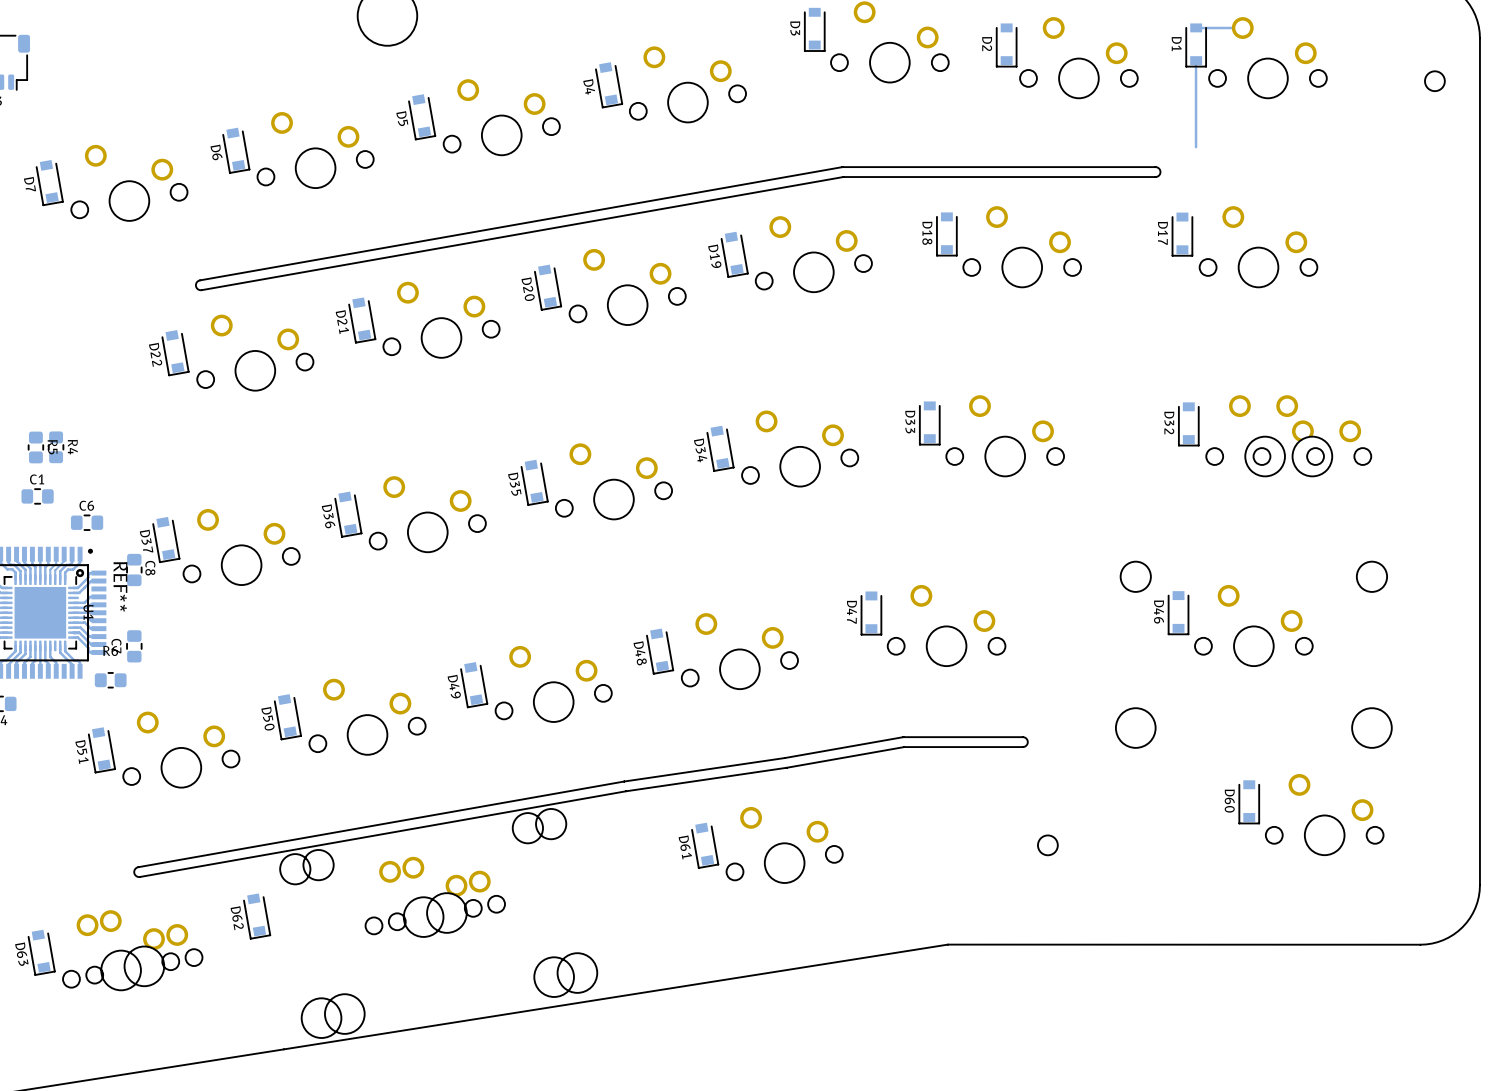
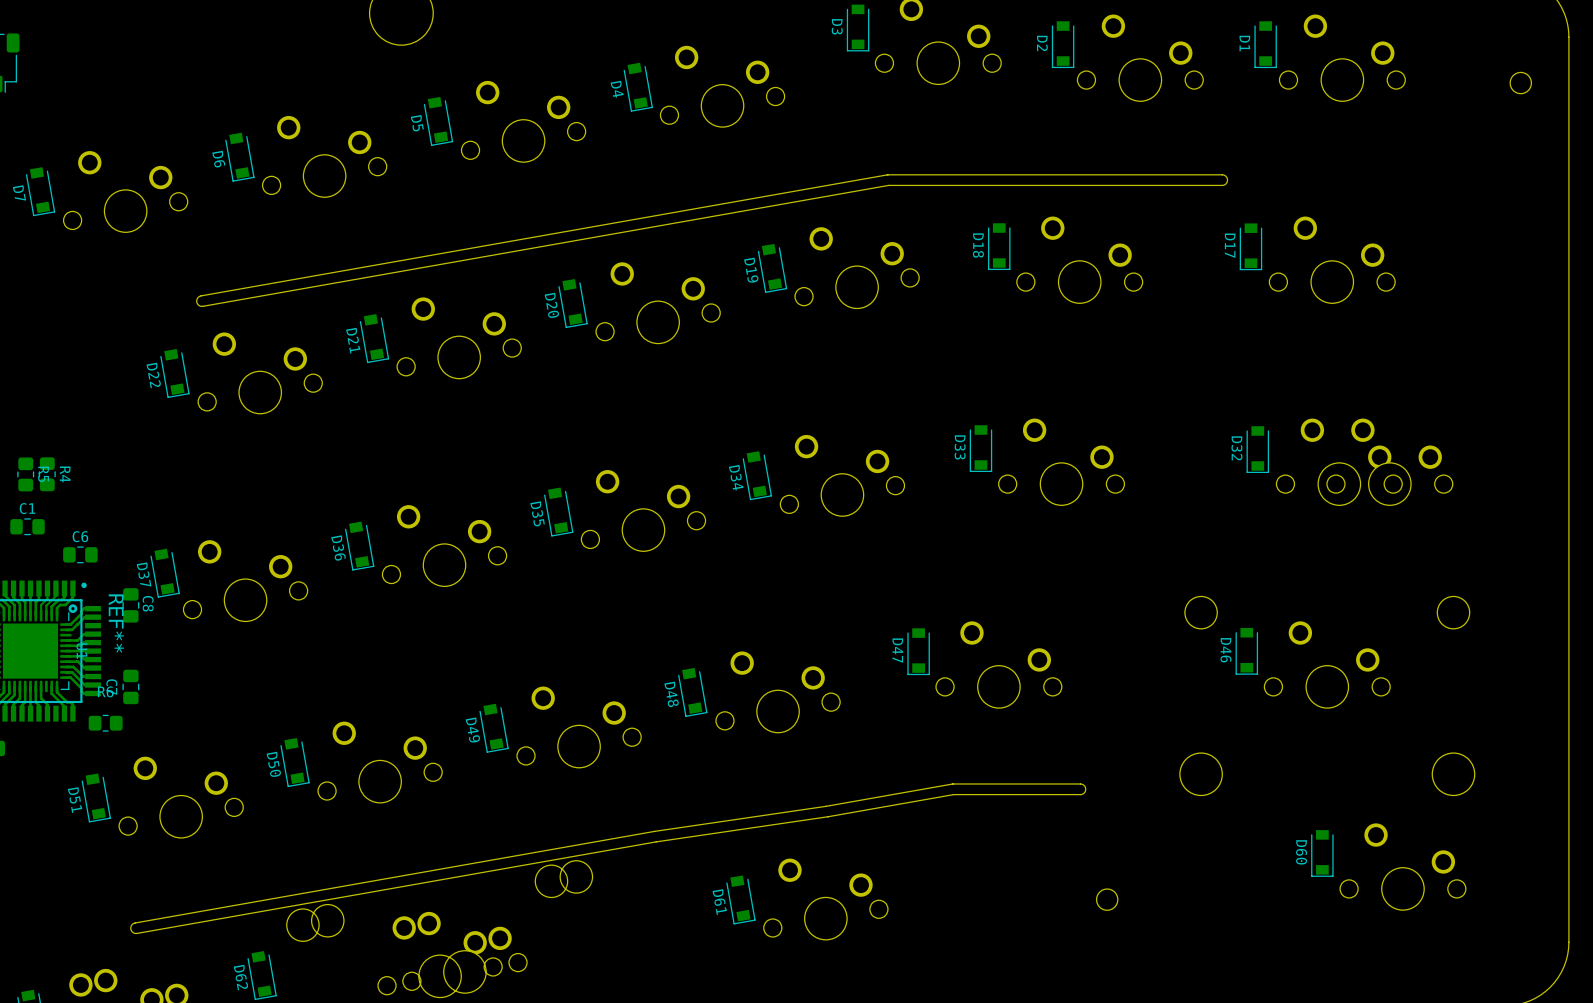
track: (1242, 28) (1196, 28) -> none
track: (1196, 60) (1196, 147) -> none

